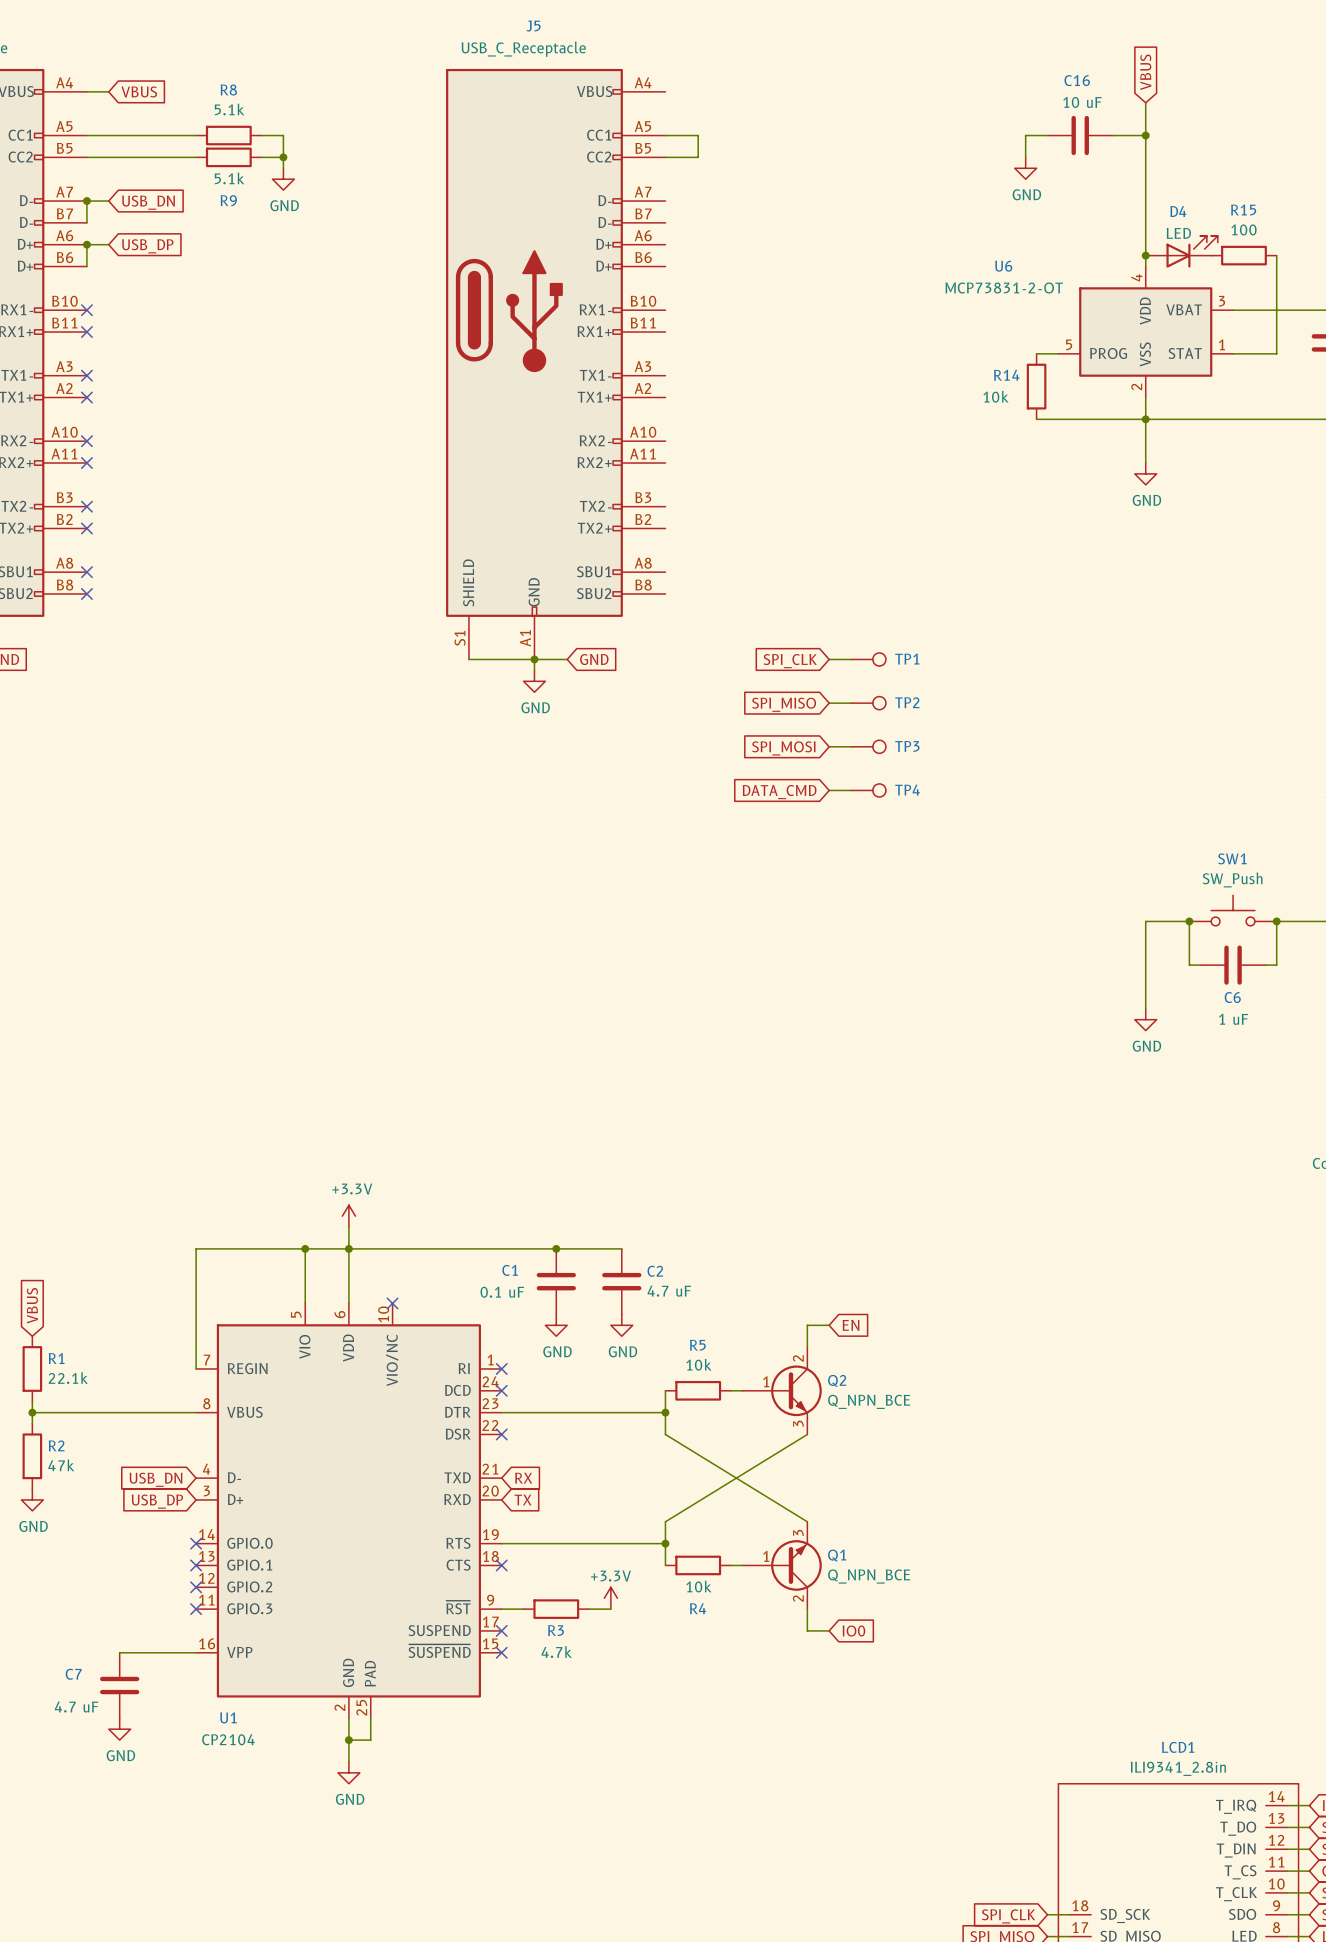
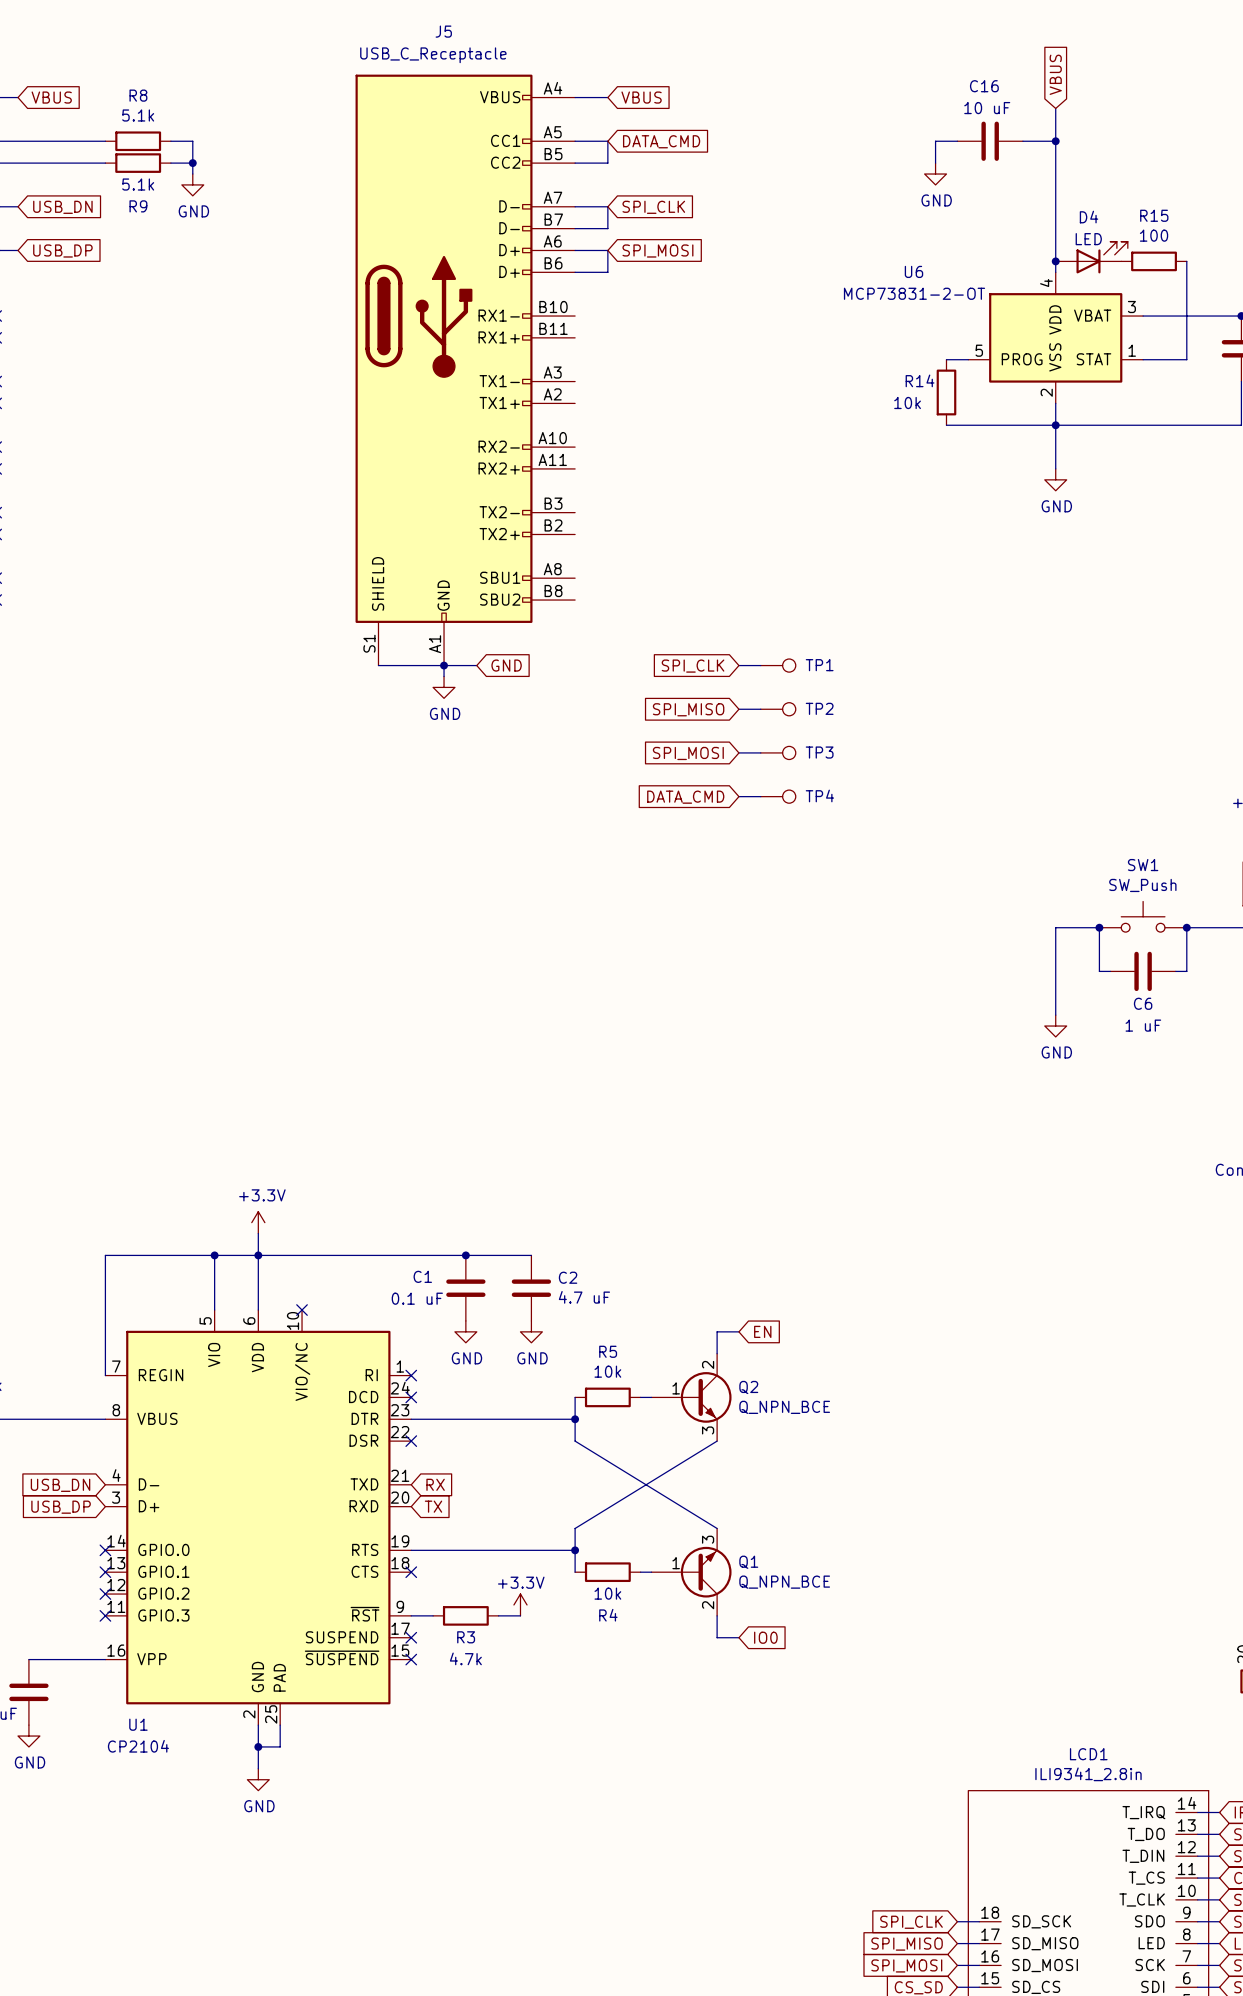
wire: none -> (575, 97) (607, 97)
global label: none -> VBUS (641, 97)
global label: none -> DATA_CMD (661, 141)
wire: none -> (575, 206) (607, 206) (607, 228) (575, 228)
global label: none -> SPI_CLK (653, 207)
wire: none -> (575, 250) (607, 250) (607, 272) (575, 272)
global label: none -> SPI_MOSI (657, 251)

